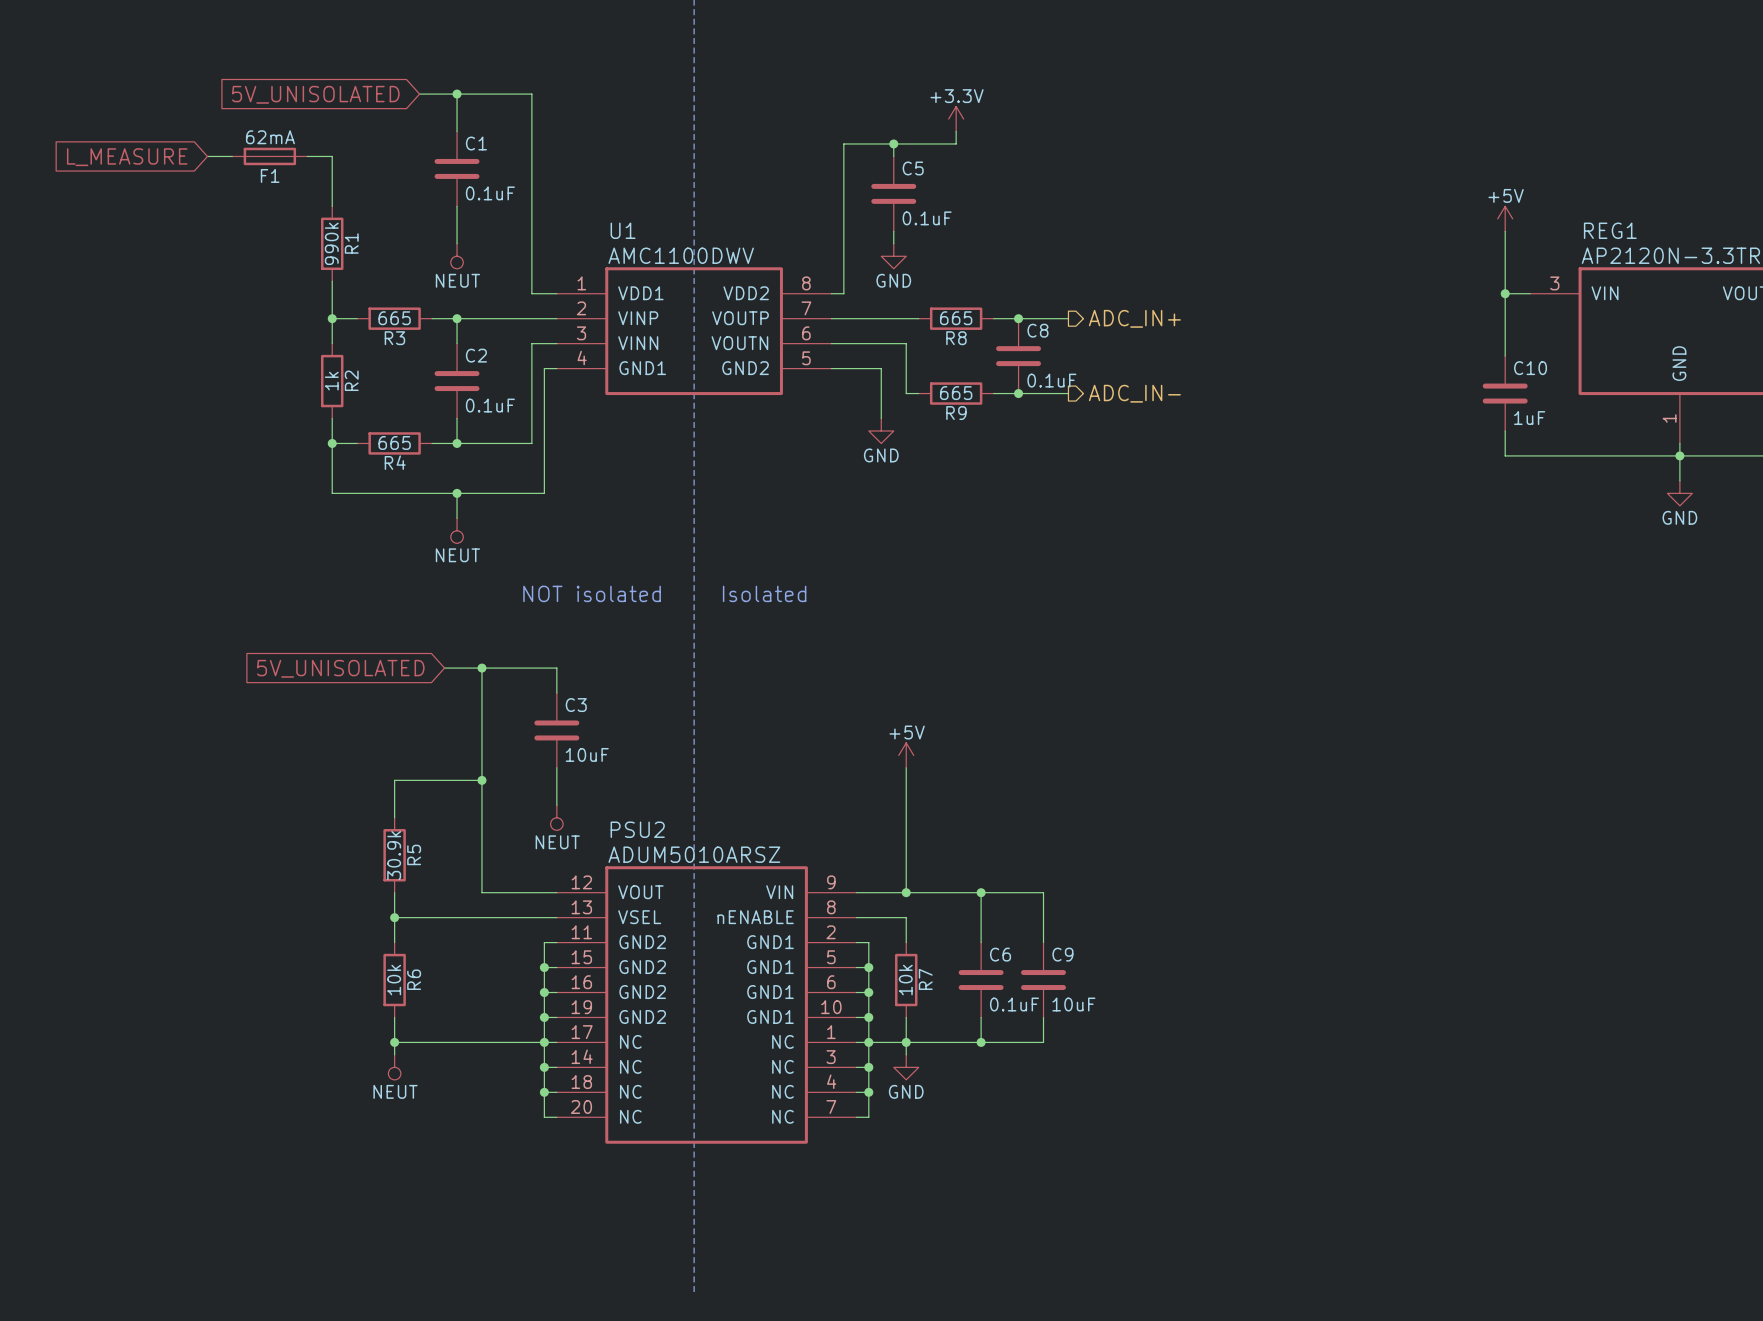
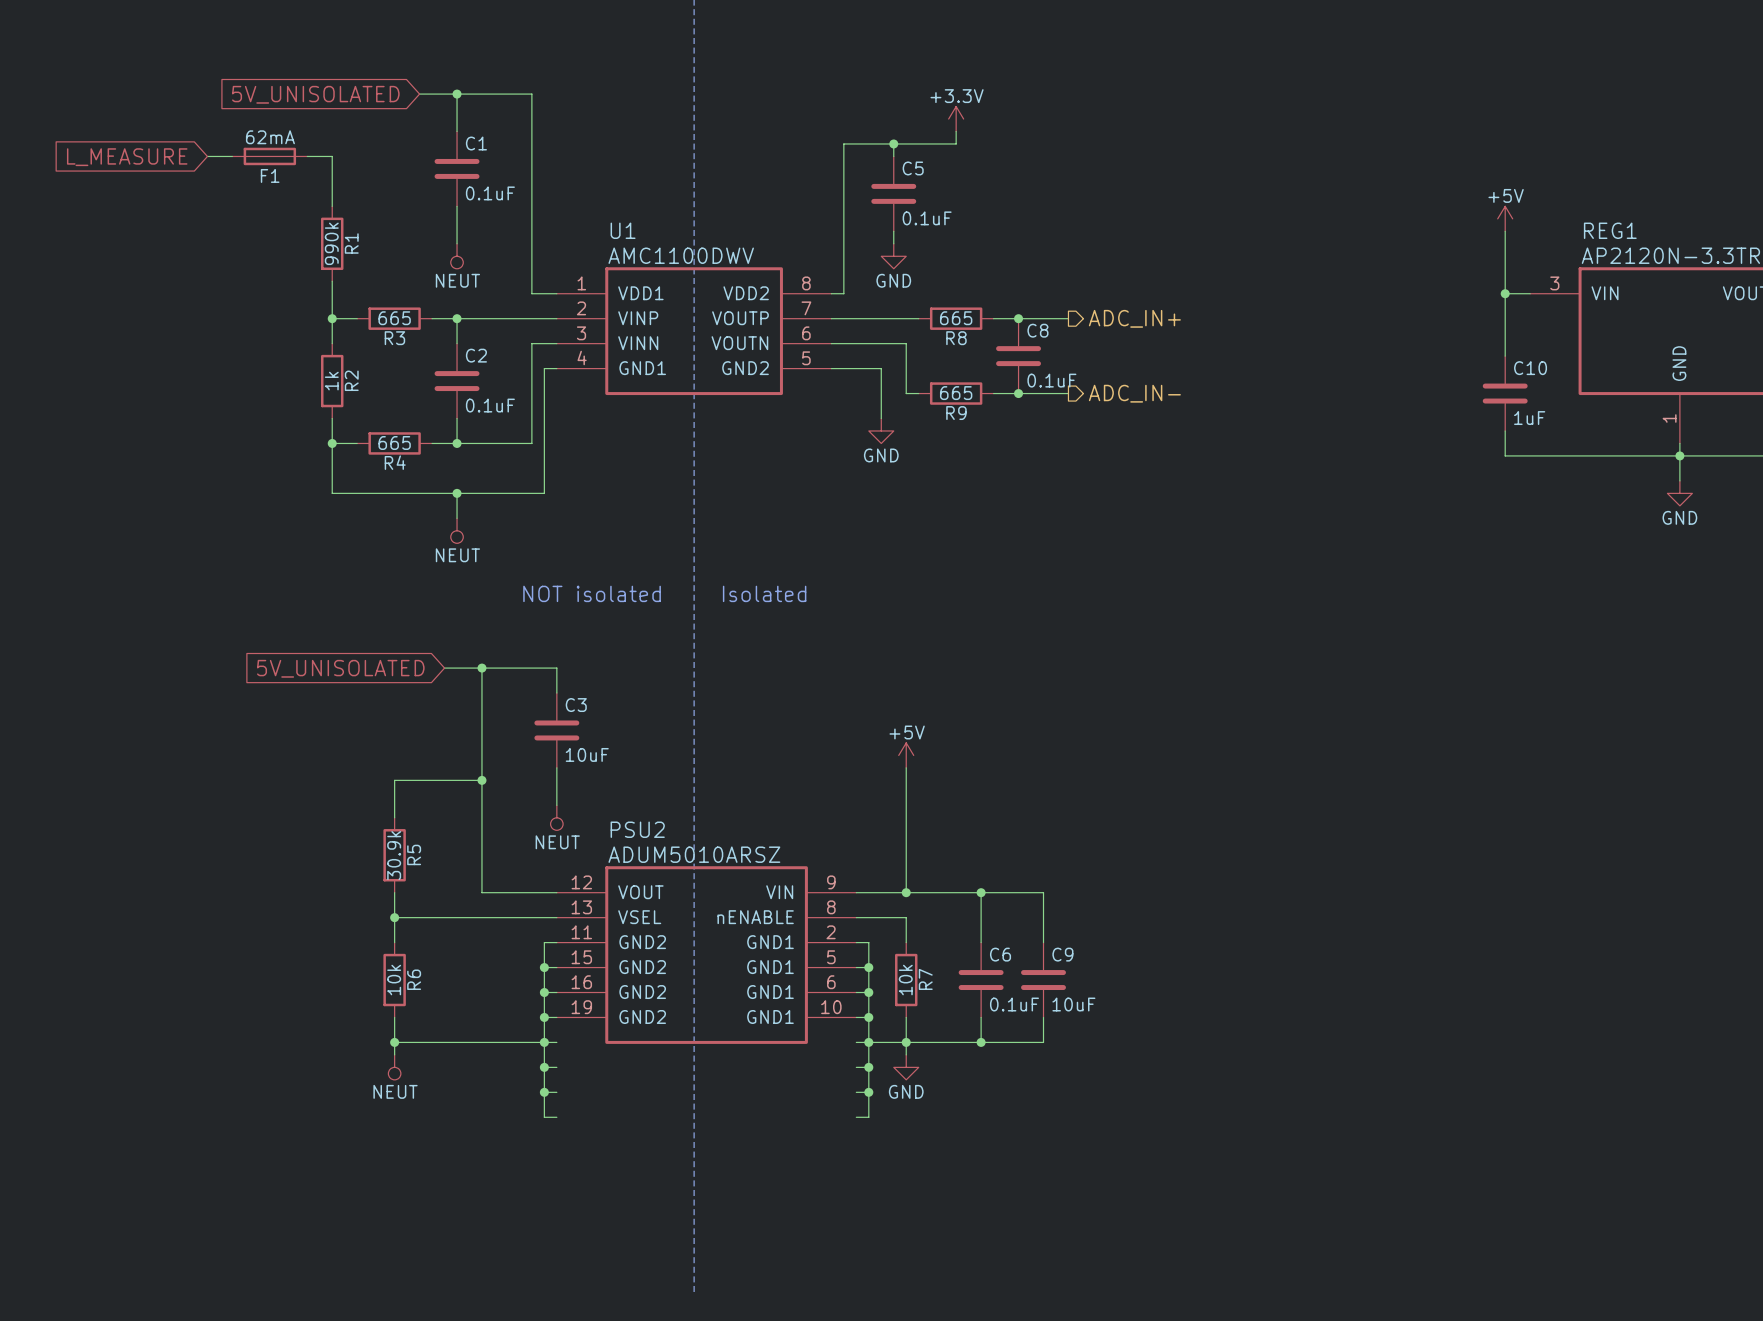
PSU2 symbol: [556, 866, 857, 1144] -> [556, 866, 857, 1044]

